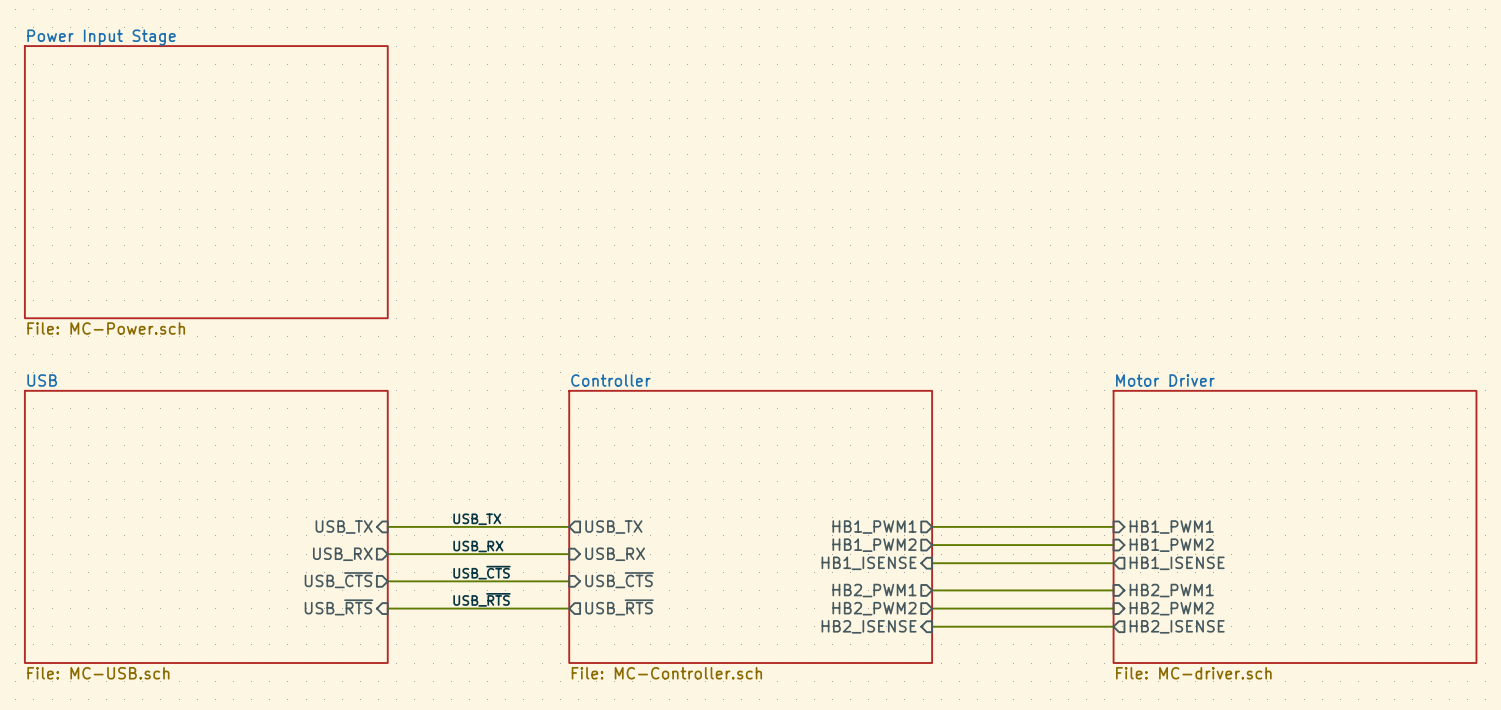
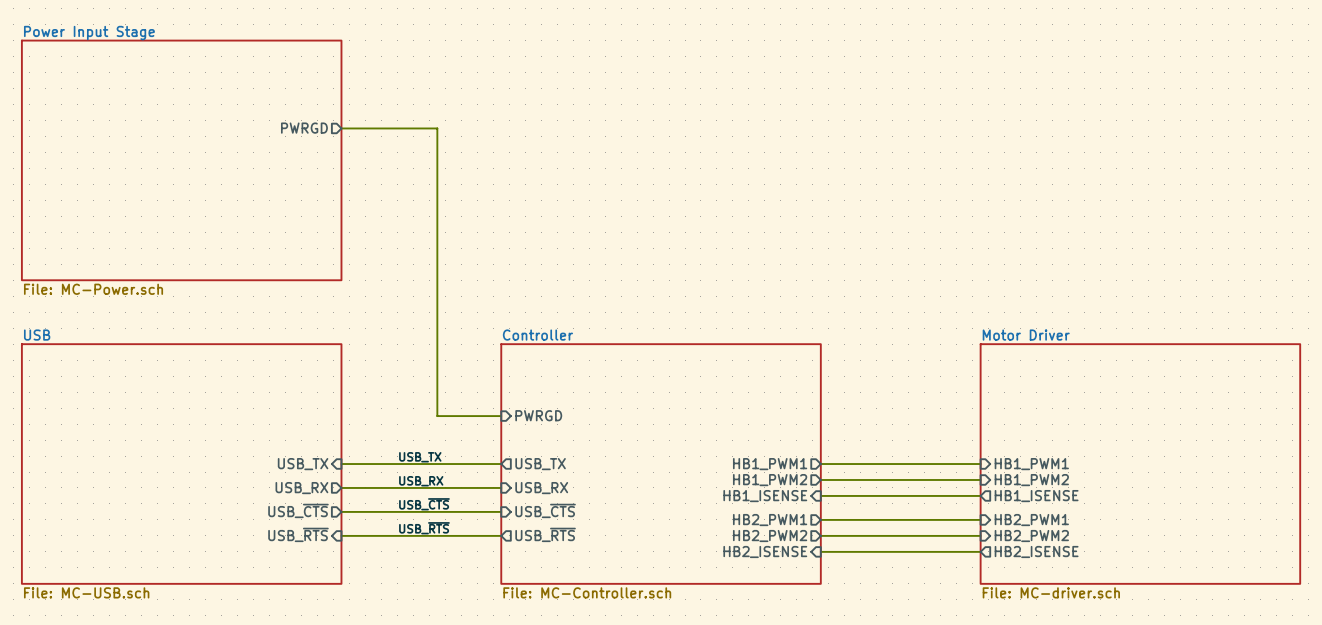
sheet pin: none -> PWRGD (304, 128)
wire: none -> (341, 128) (437, 128) (437, 416) (501, 416)
sheet pin: none -> PWRGD (538, 415)

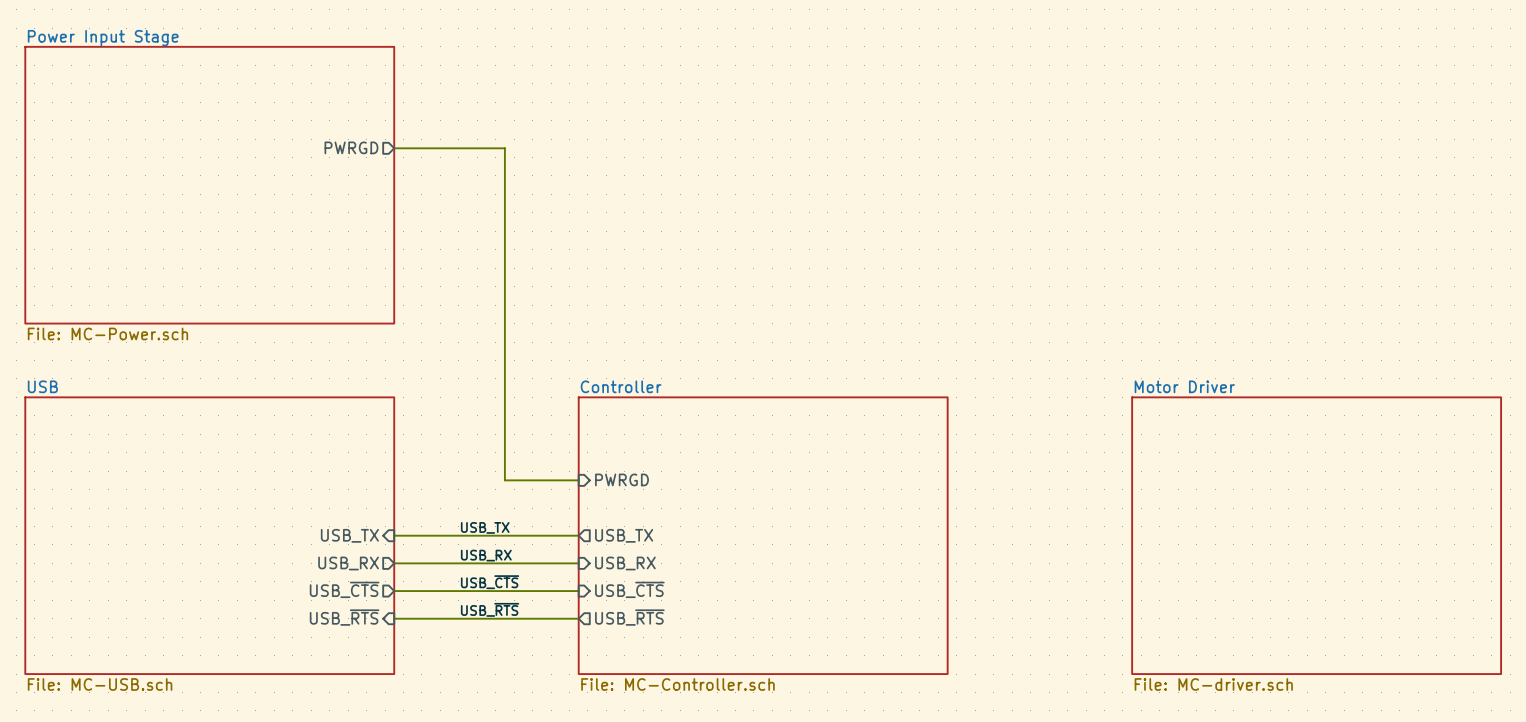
sheet pin: HB1_PWM1 (770, 464) -> none
wire: (820, 464) (980, 464) -> none
sheet pin: HB1_PWM1 (1031, 464) -> none
wire: (820, 479) (980, 479) -> none
sheet pin: HB1_PWM2 (770, 480) -> none
sheet pin: HB1_PWM2 (1031, 480) -> none
wire: (820, 495) (980, 495) -> none
sheet pin: HB1_ISENSE (765, 496) -> none
sheet pin: HB1_ISENSE (1036, 496) -> none
wire: (820, 519) (980, 519) -> none
sheet pin: HB2_PWM1 (770, 520) -> none
sheet pin: HB2_PWM1 (1031, 520) -> none
wire: (820, 535) (980, 535) -> none
sheet pin: HB2_PWM2 (770, 536) -> none
sheet pin: HB2_PWM2 (1031, 536) -> none
sheet pin: HB2_ISENSE (765, 551) -> none
wire: (820, 551) (980, 551) -> none
sheet pin: HB2_ISENSE (1036, 551) -> none

